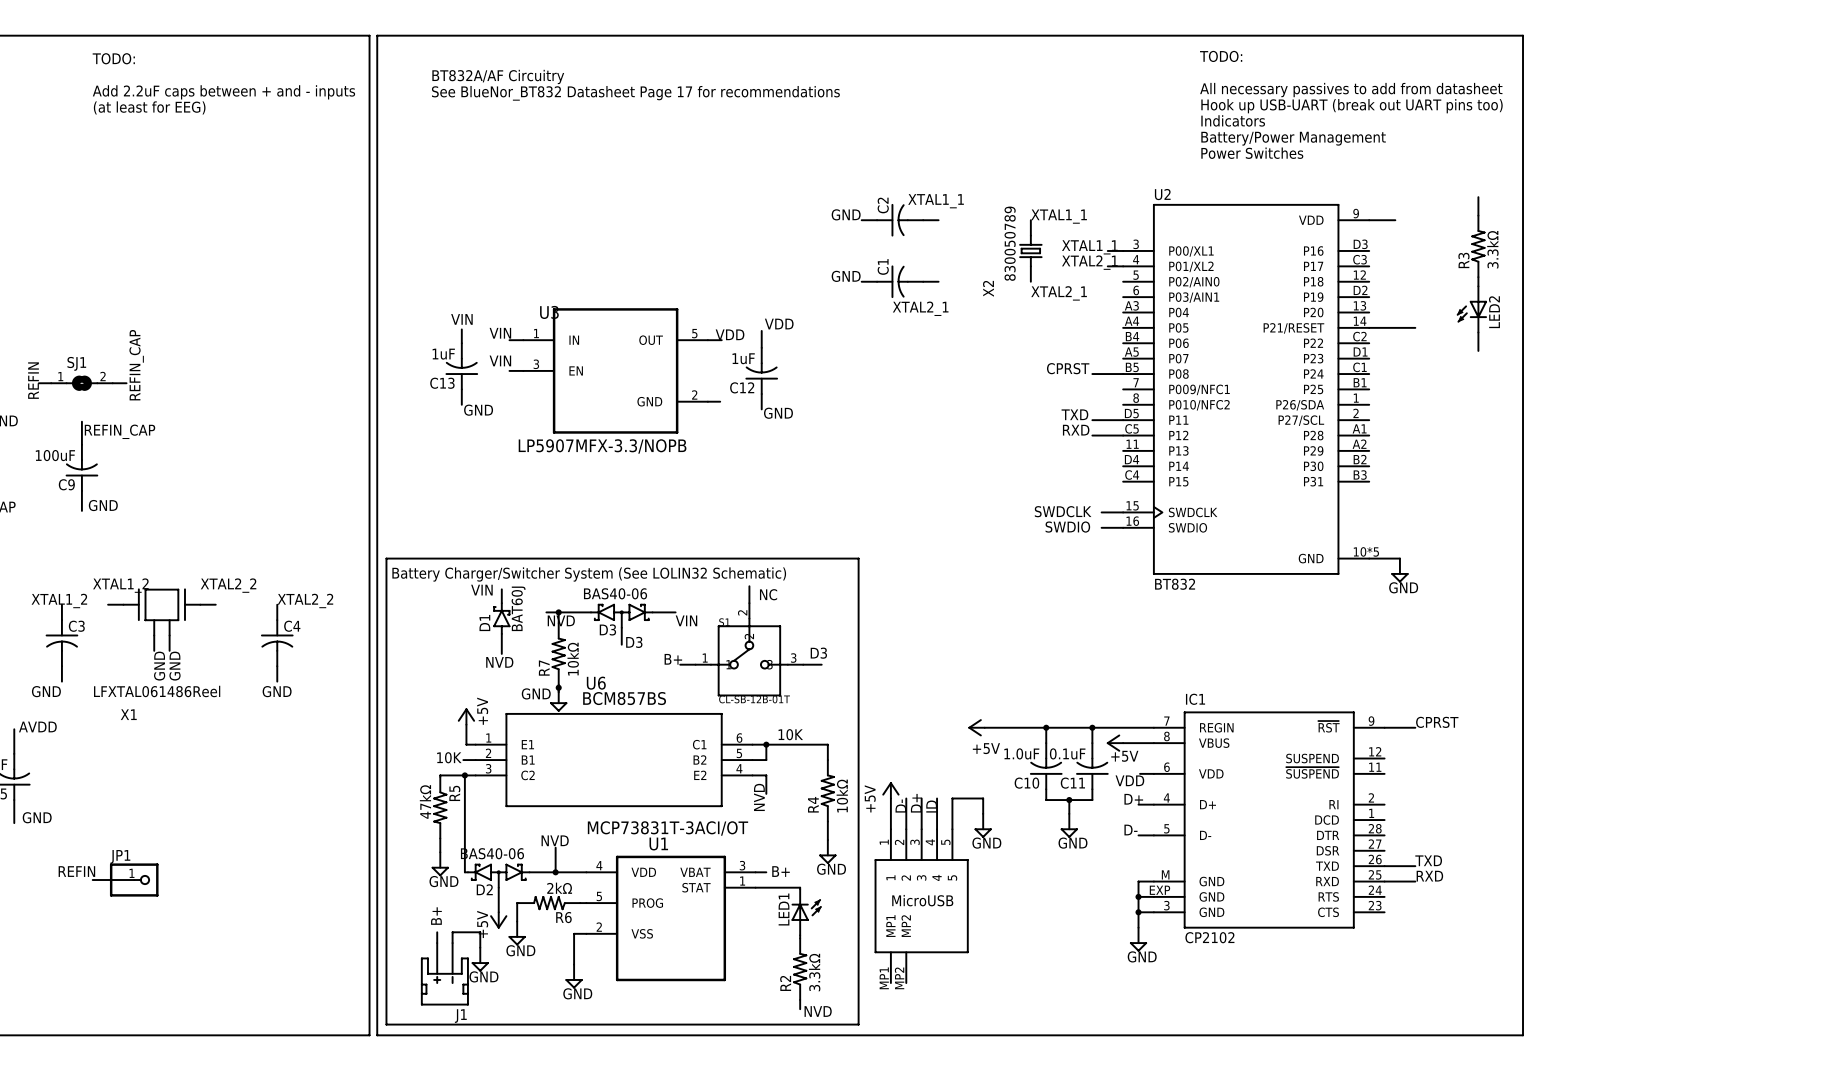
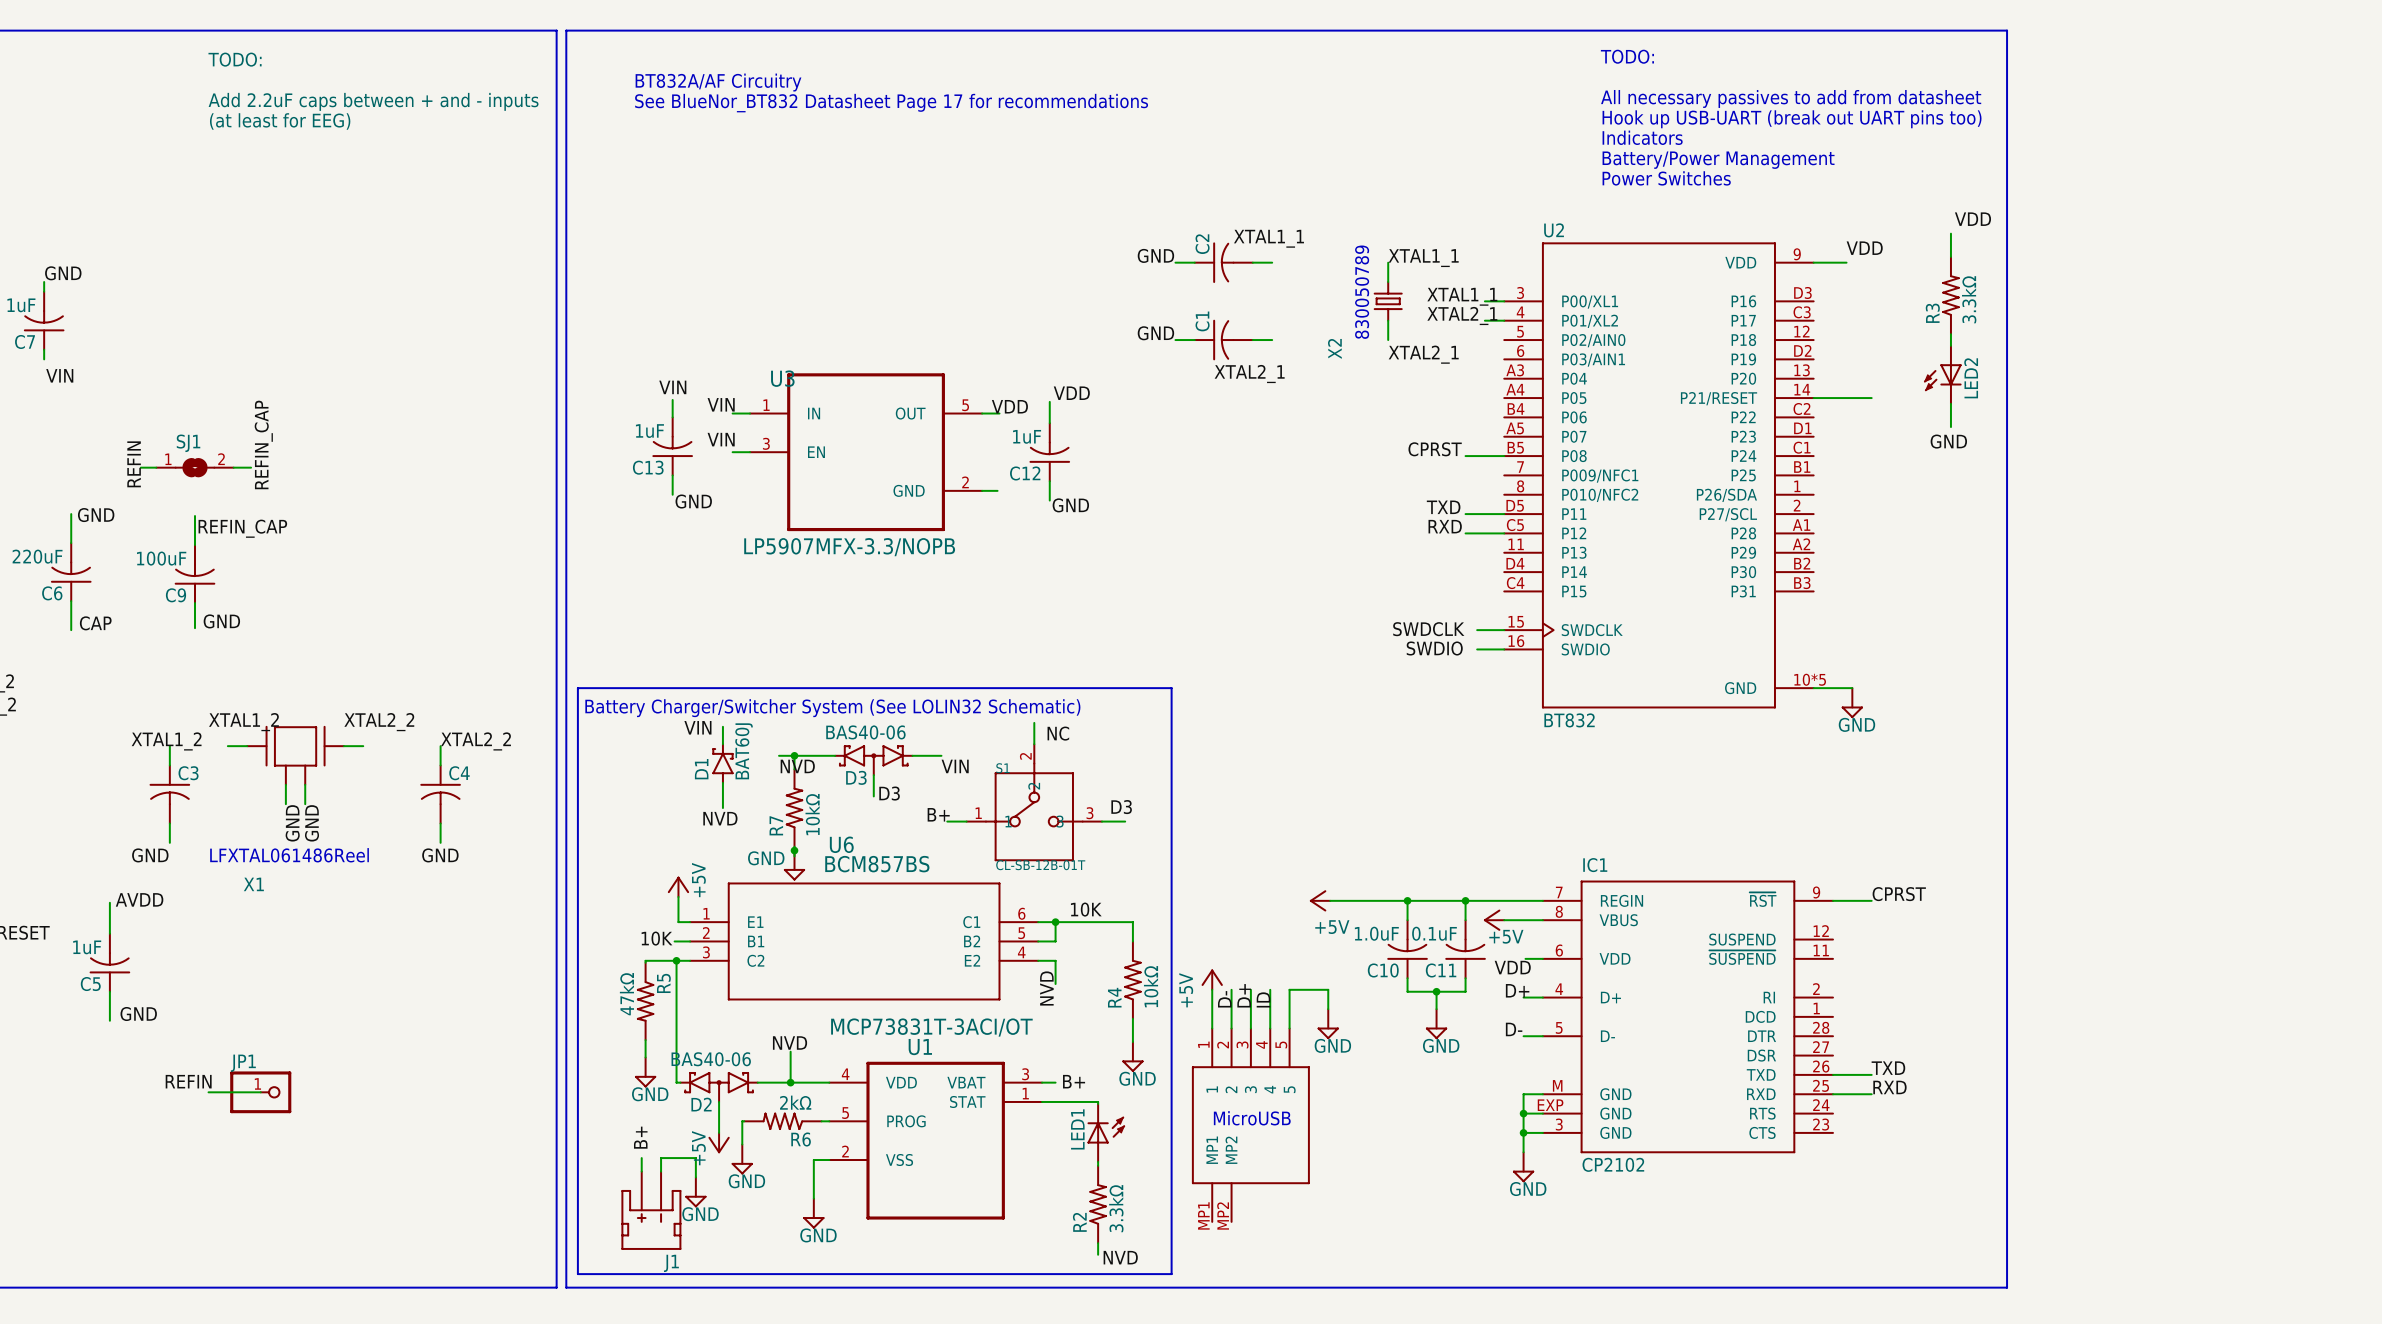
label: none -> VDD (1972, 219)
label: none -> VDD (1864, 248)
label: none -> GND (1948, 441)

